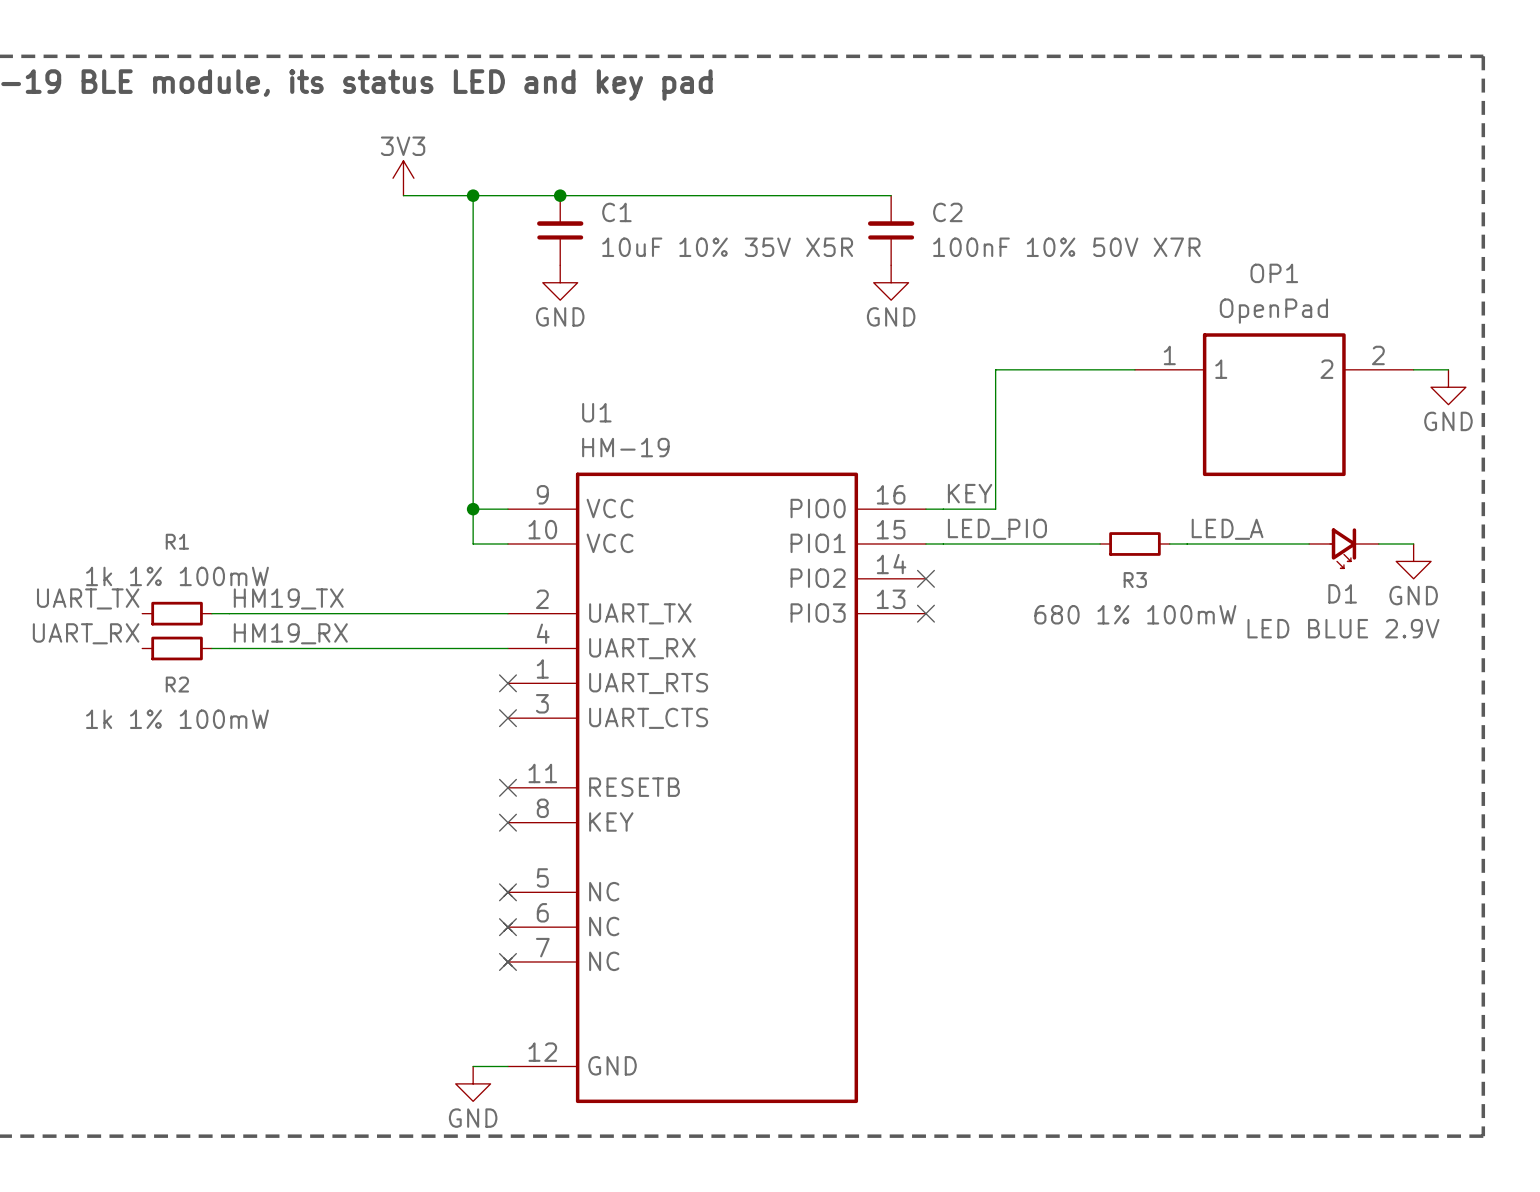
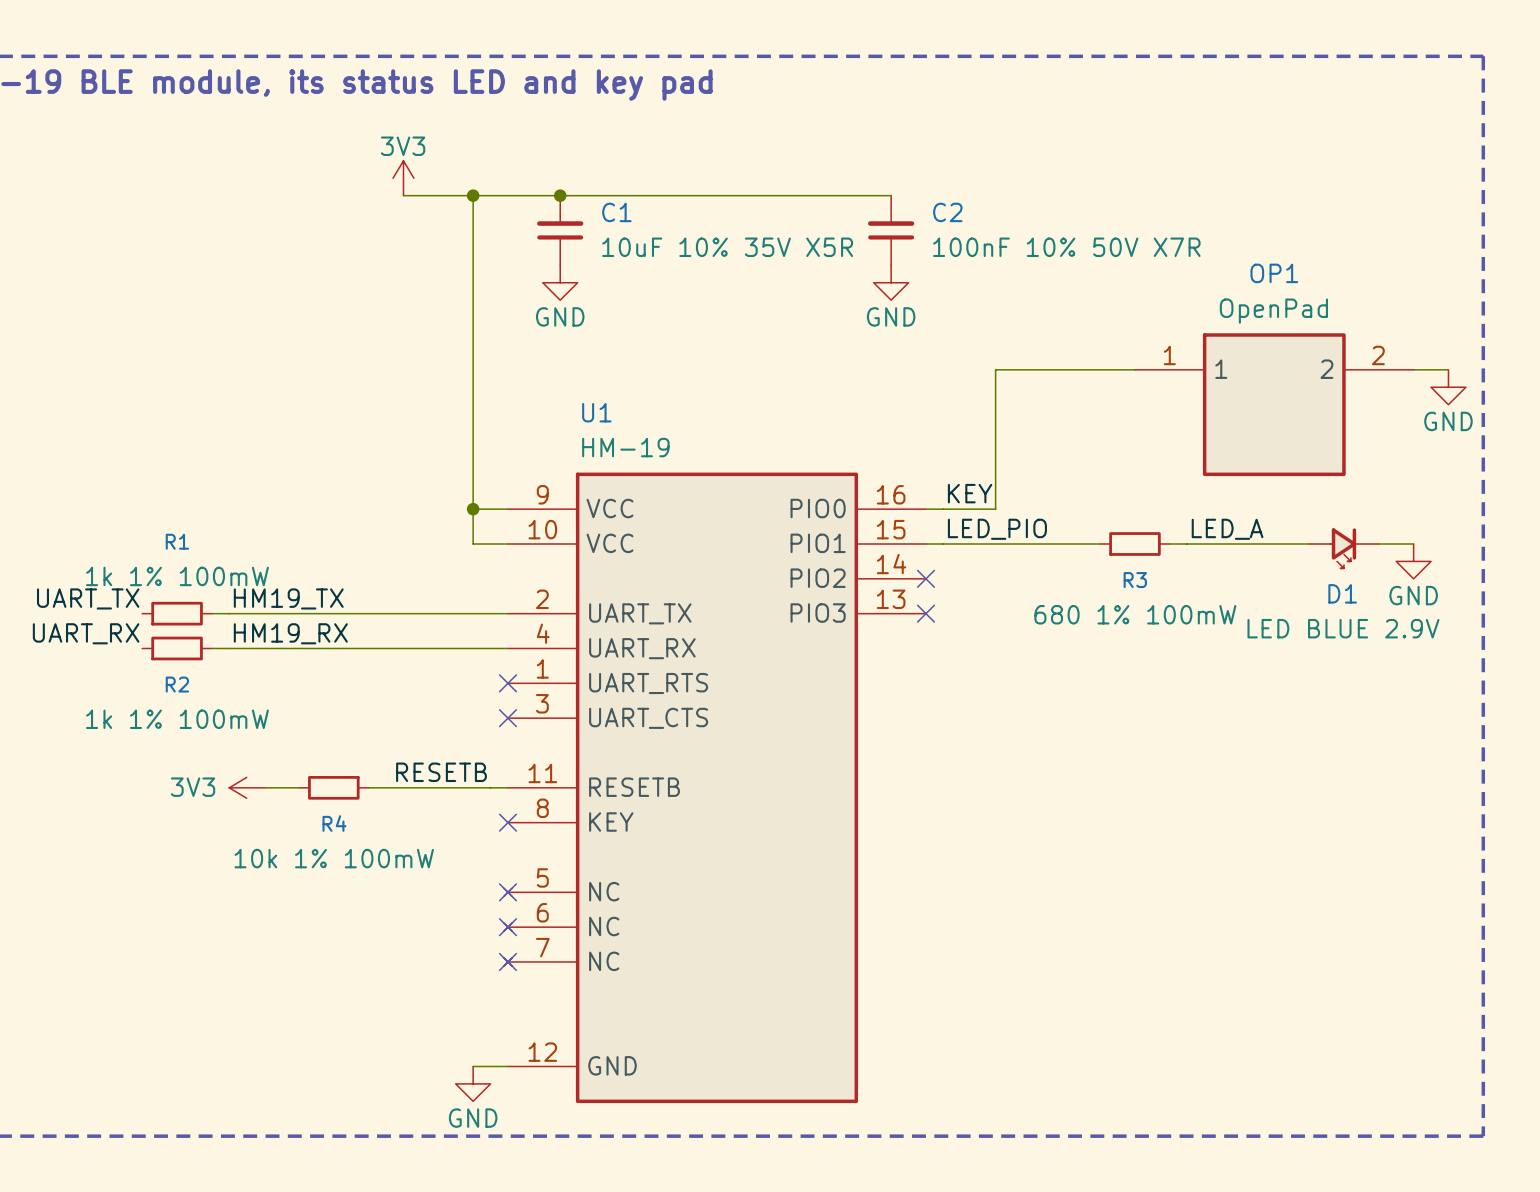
label: none -> RESETB (441, 772)
power symbol: none -> 3V3 (246, 787)
wire: none -> (264, 787) (298, 787)
R4: none -> 10k 1% 100mW (333, 787)
wire: none -> (368, 787) (507, 787)
no-connect mark: (507, 787) -> none

